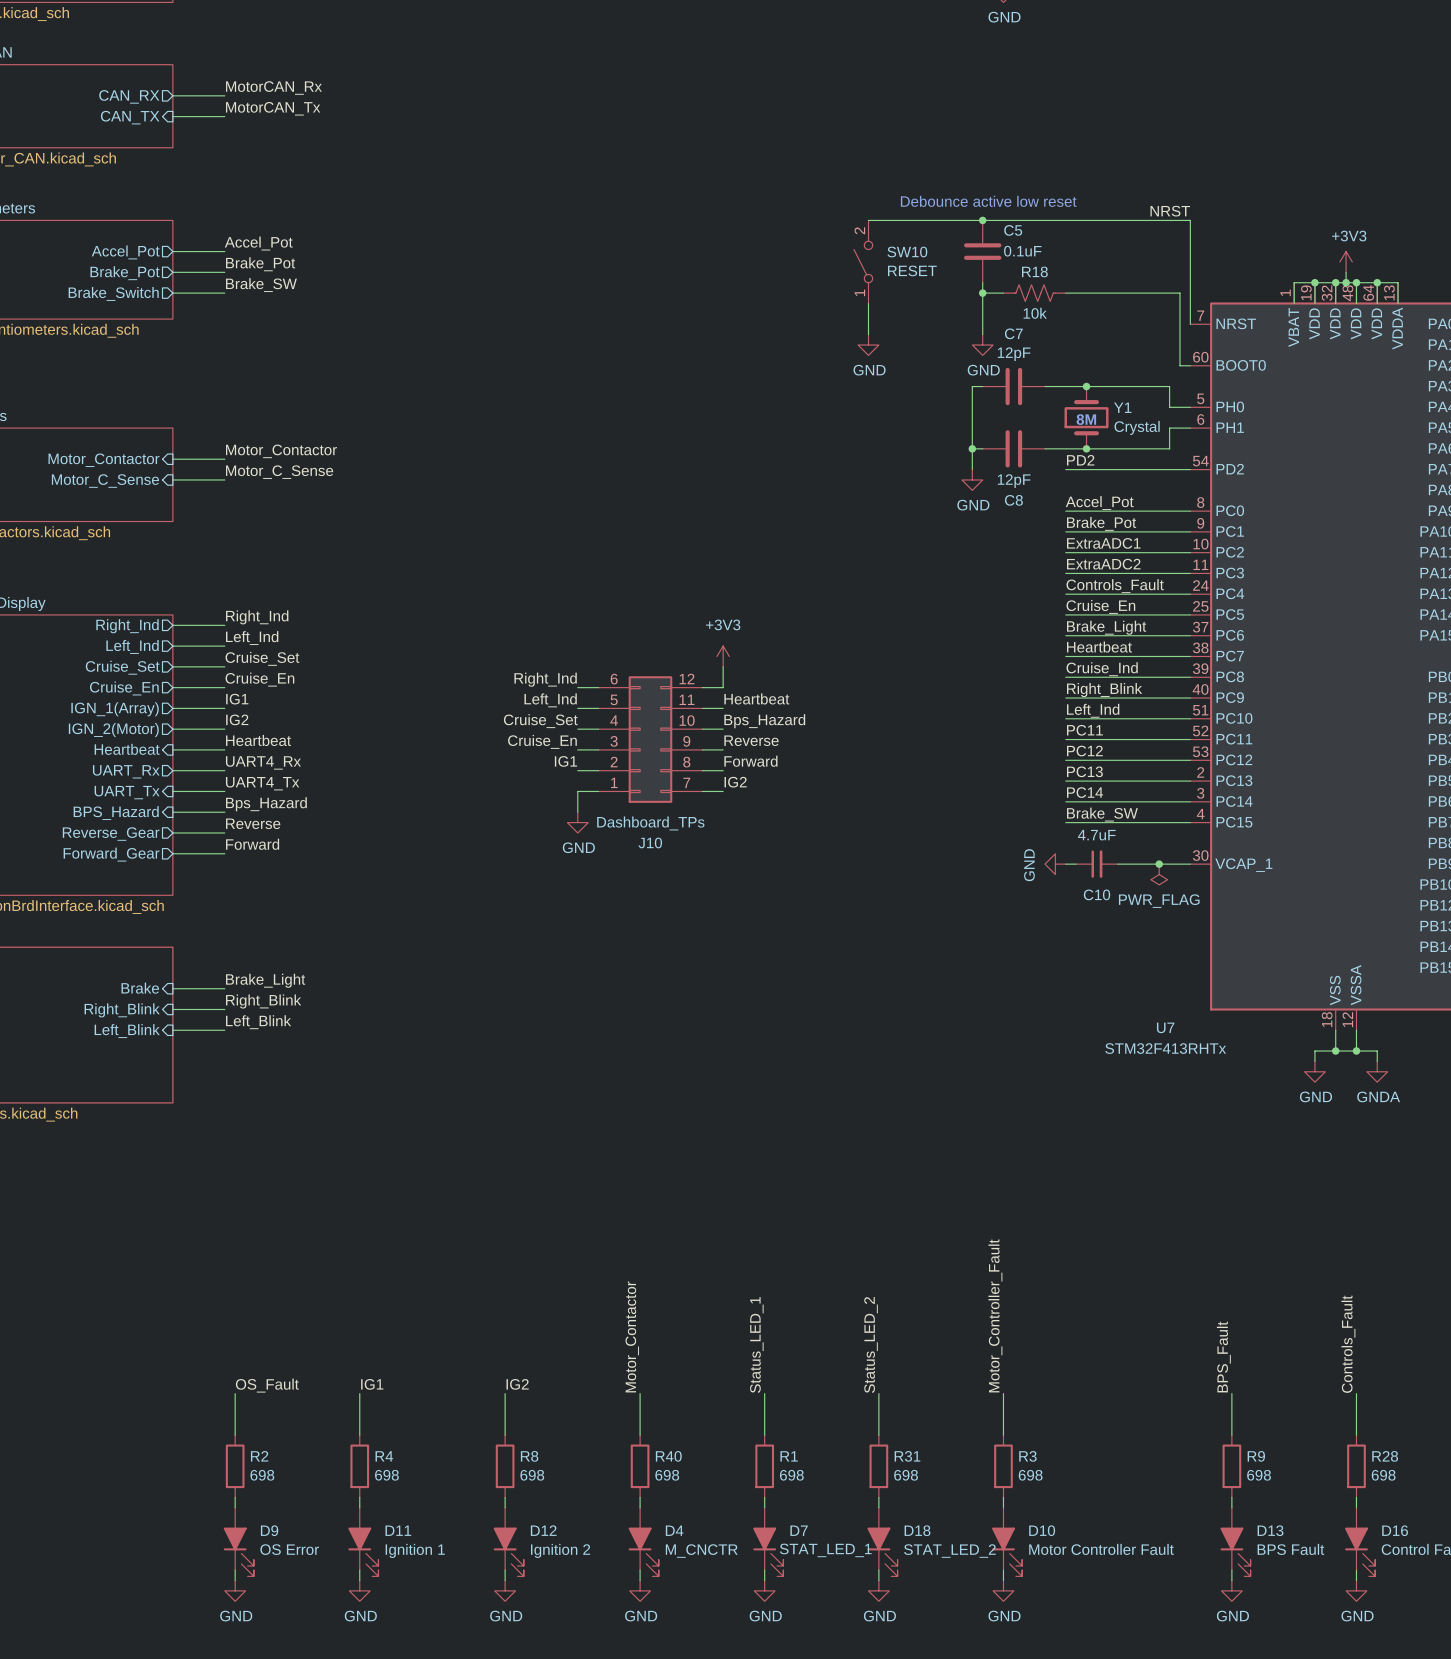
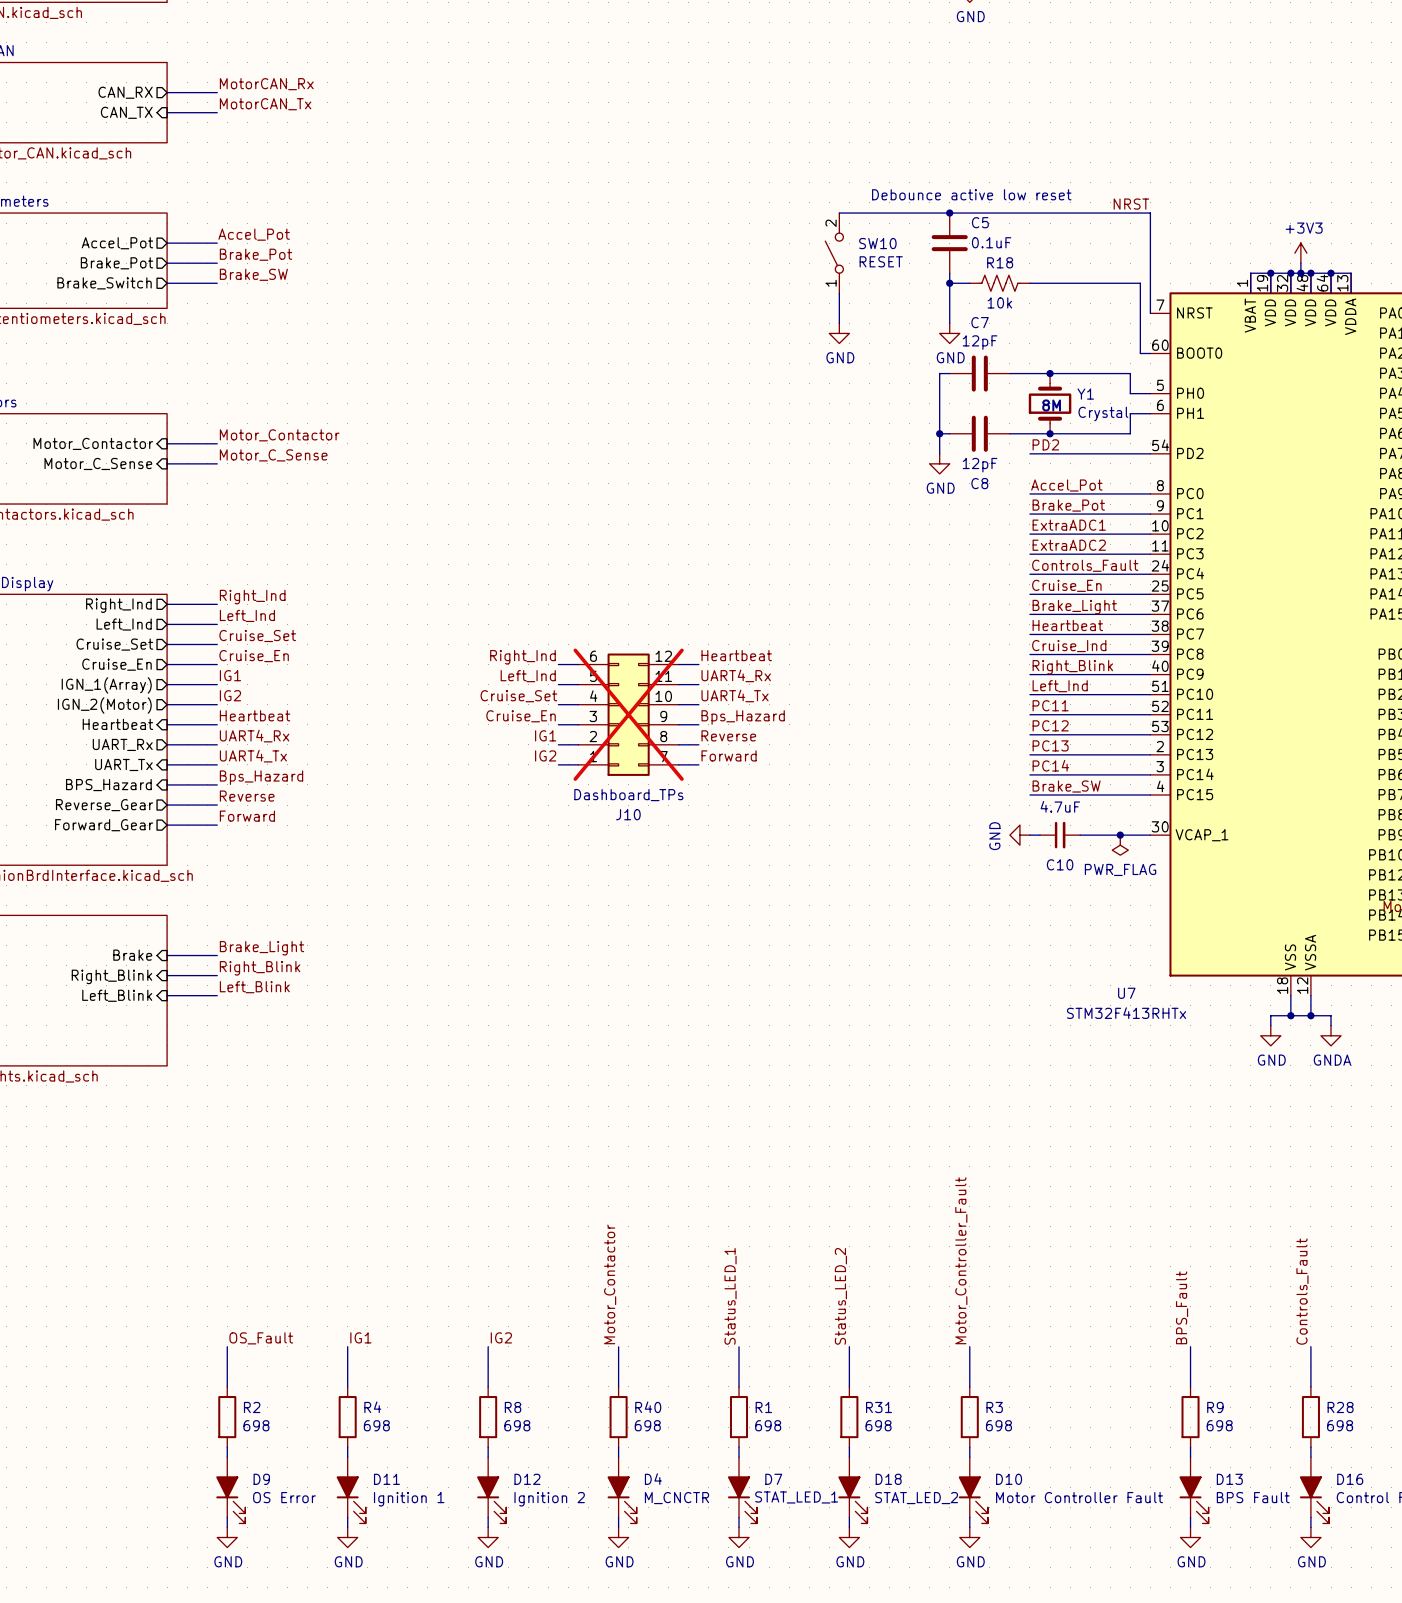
power symbol: +3V3 (723, 656) -> none
wire: (723, 666) (723, 687) -> none
label: none -> Heartbeat (736, 655)
label: Heartbeat (756, 698) -> UART4_Rx (736, 675)
label: Bps_Hazard (764, 721) -> UART4_Tx (735, 695)
J10 do-not-place cross: none -> (628, 714)
label: Reverse (751, 740) -> Bps_Hazard (743, 717)
label: Forward (750, 761) -> Reverse (728, 735)
label: none -> IG2 (545, 755)
label: IG2 (735, 782) -> Forward (729, 755)
wire: (577, 791) (577, 812) -> none
power symbol: GND (577, 822) -> none

